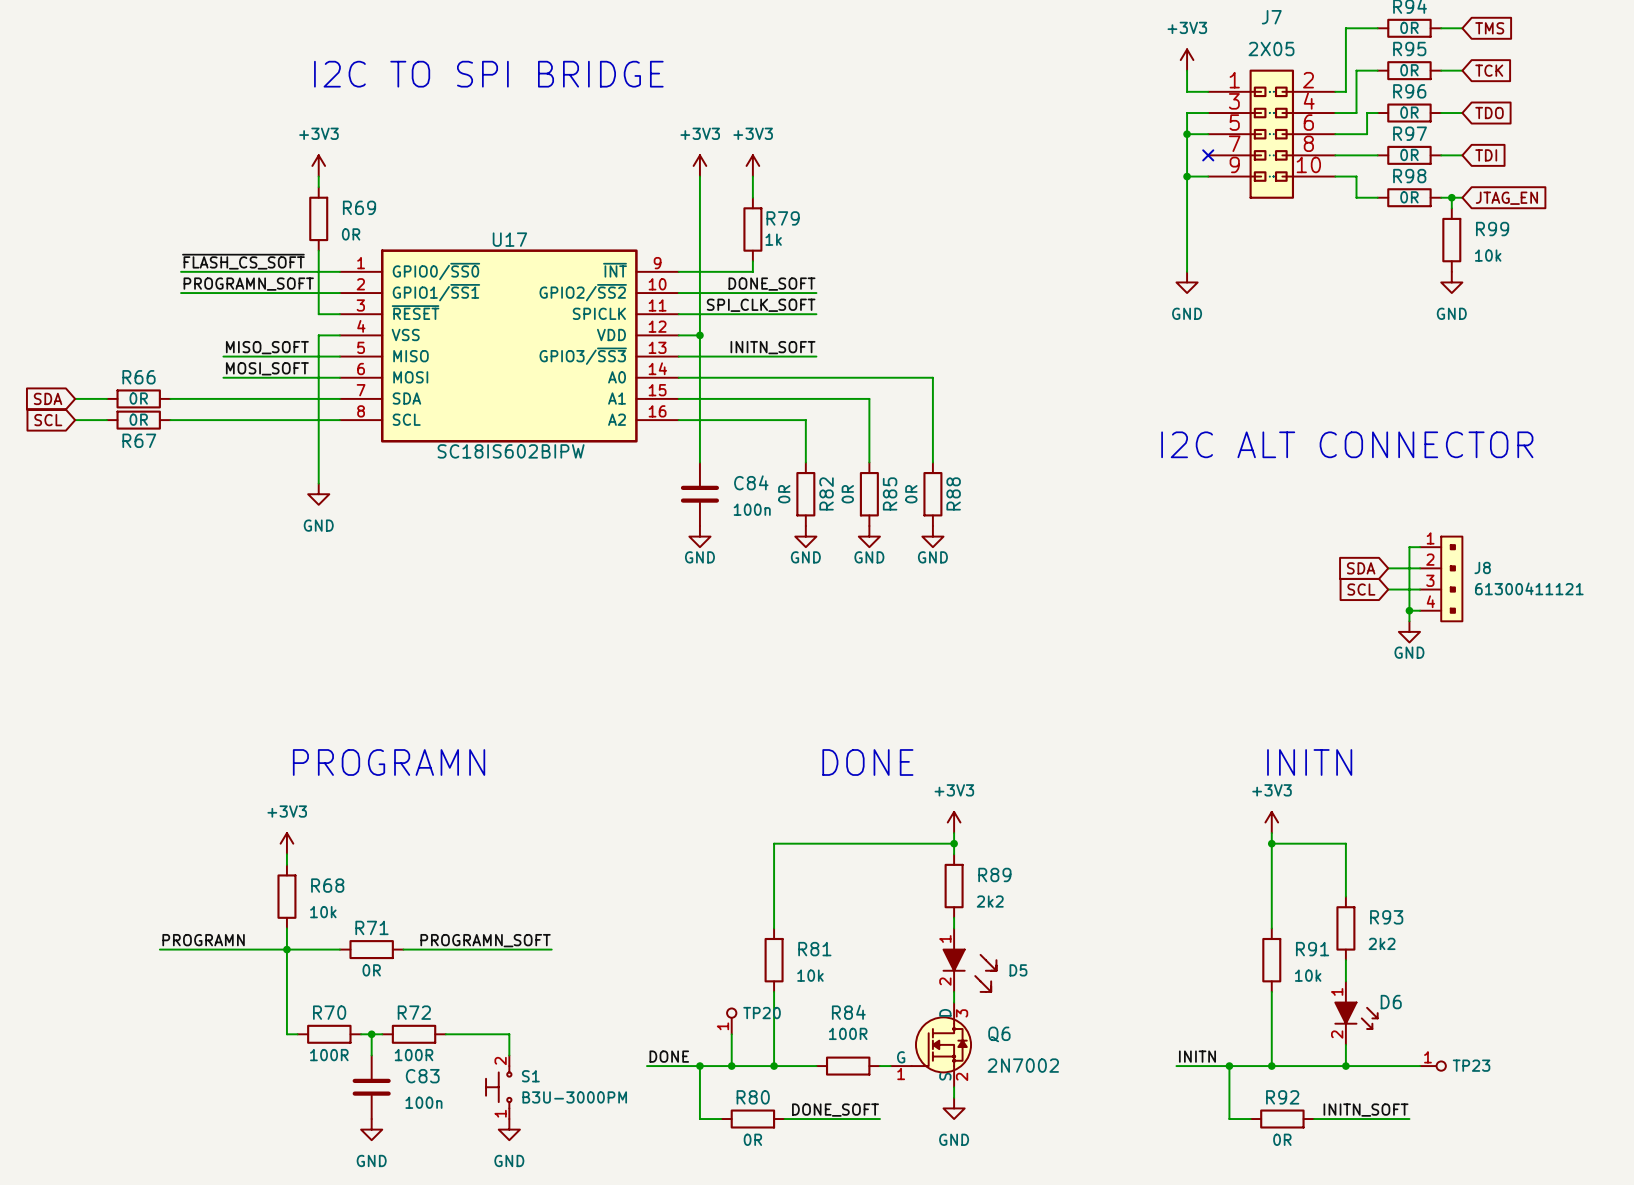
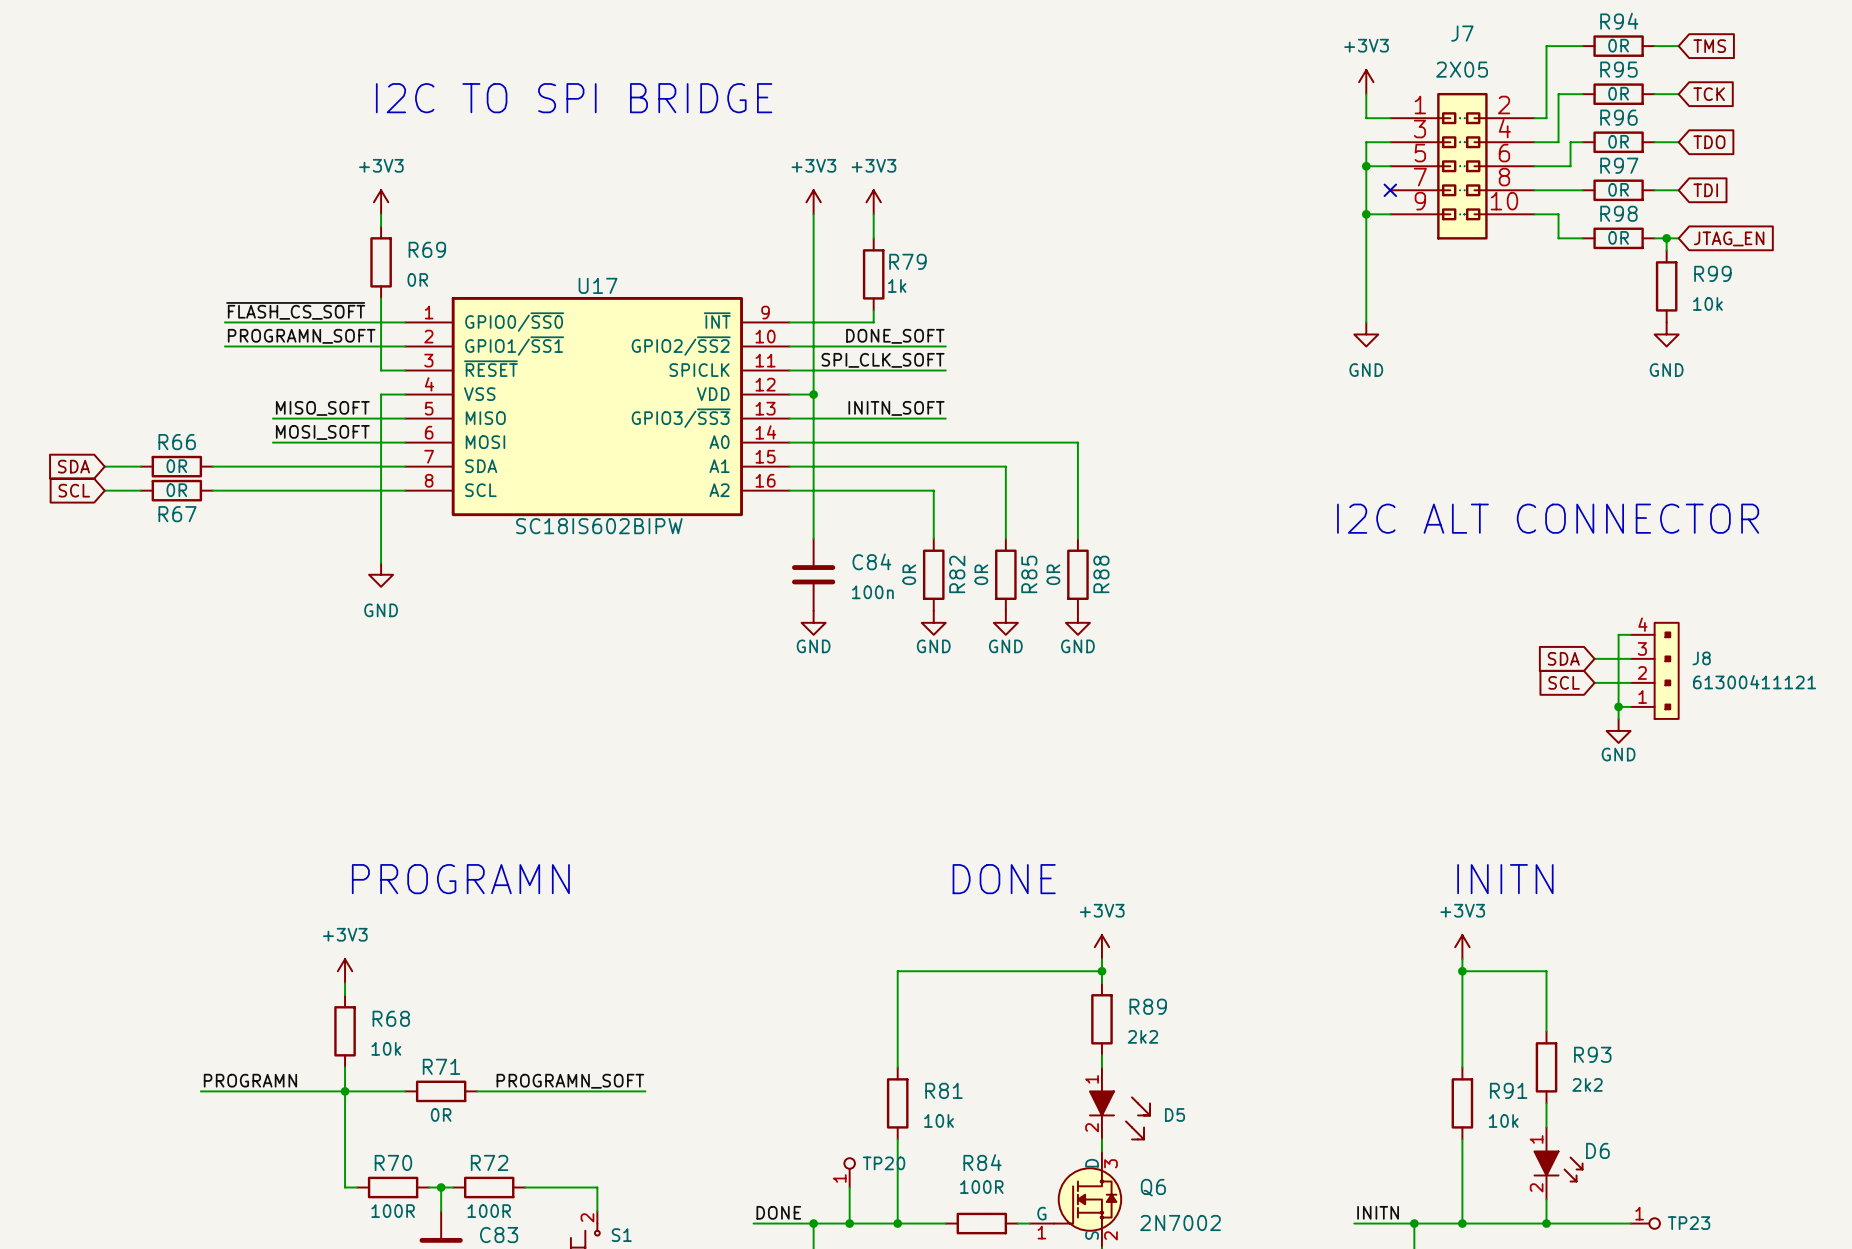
J8 flip: as is (1451, 578) -> up-down (1666, 670)

